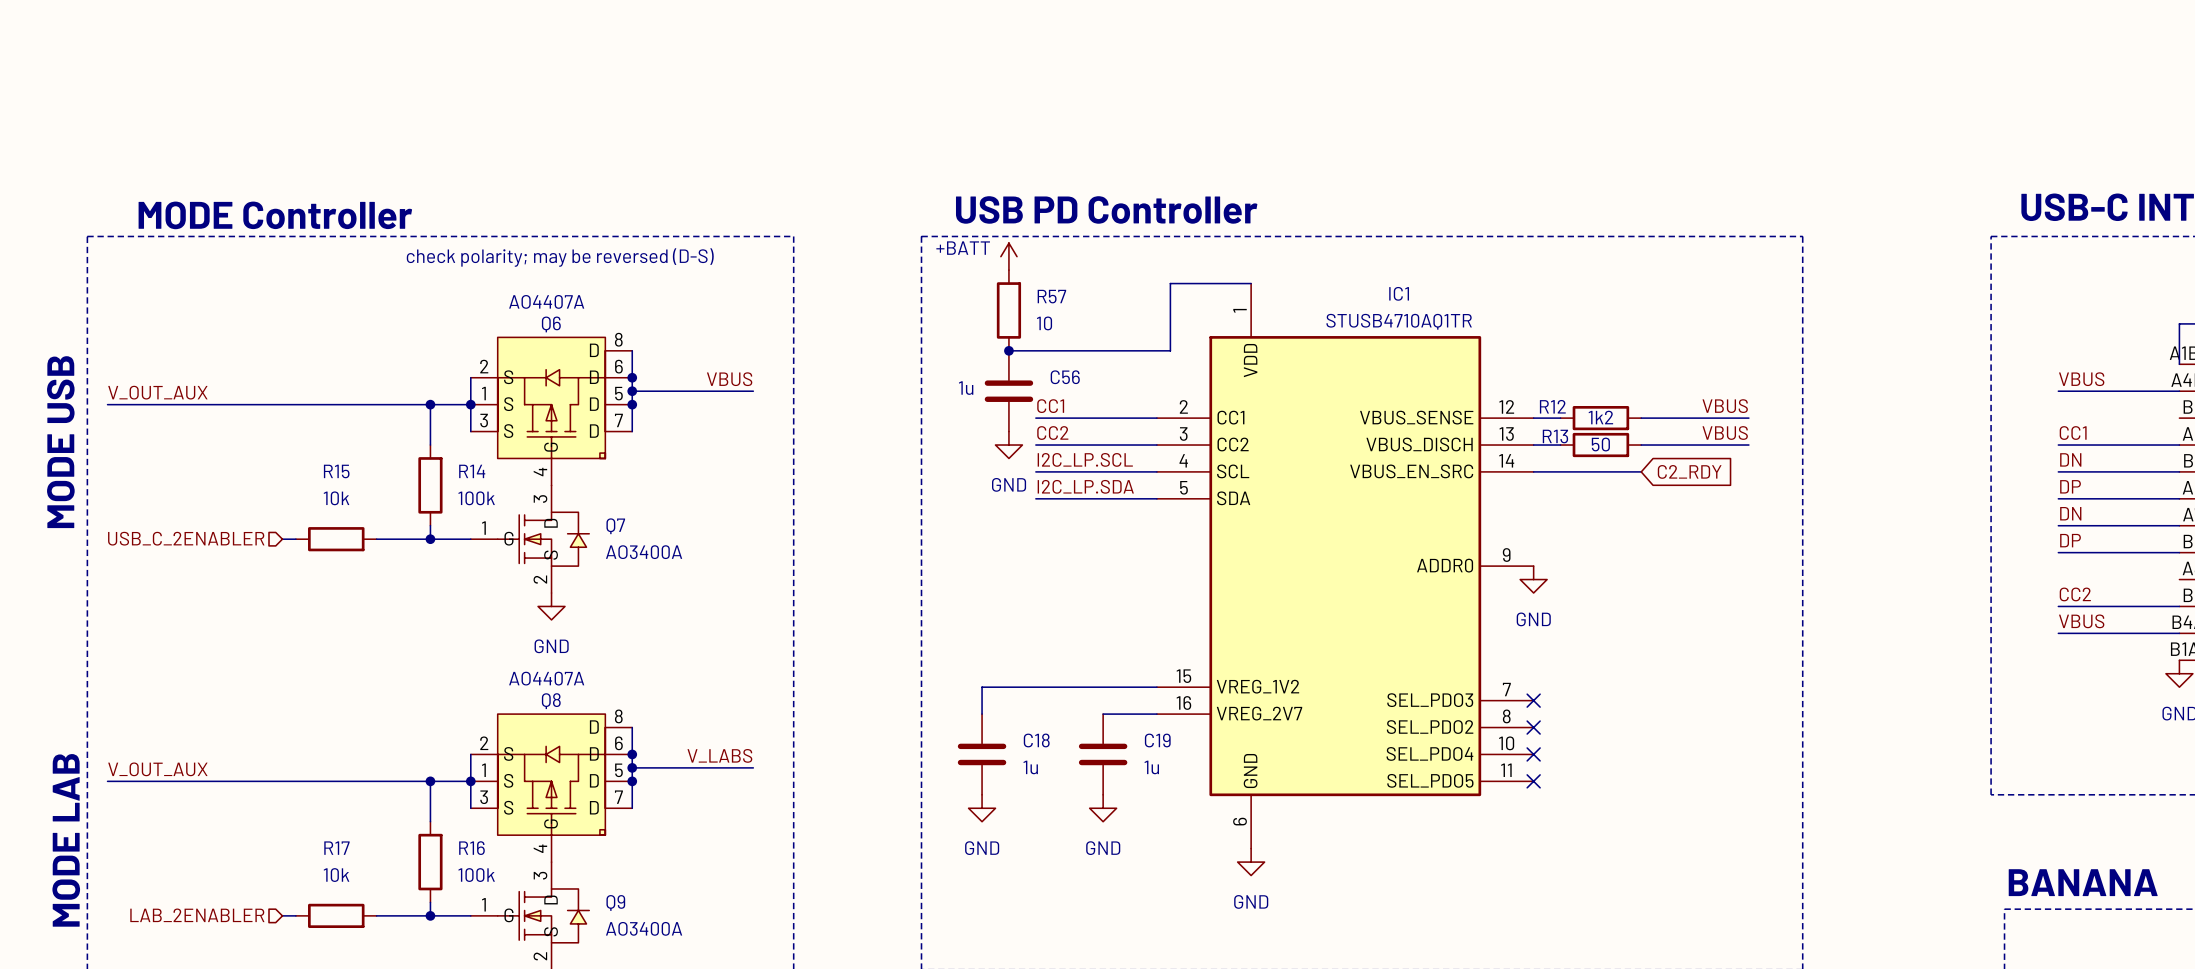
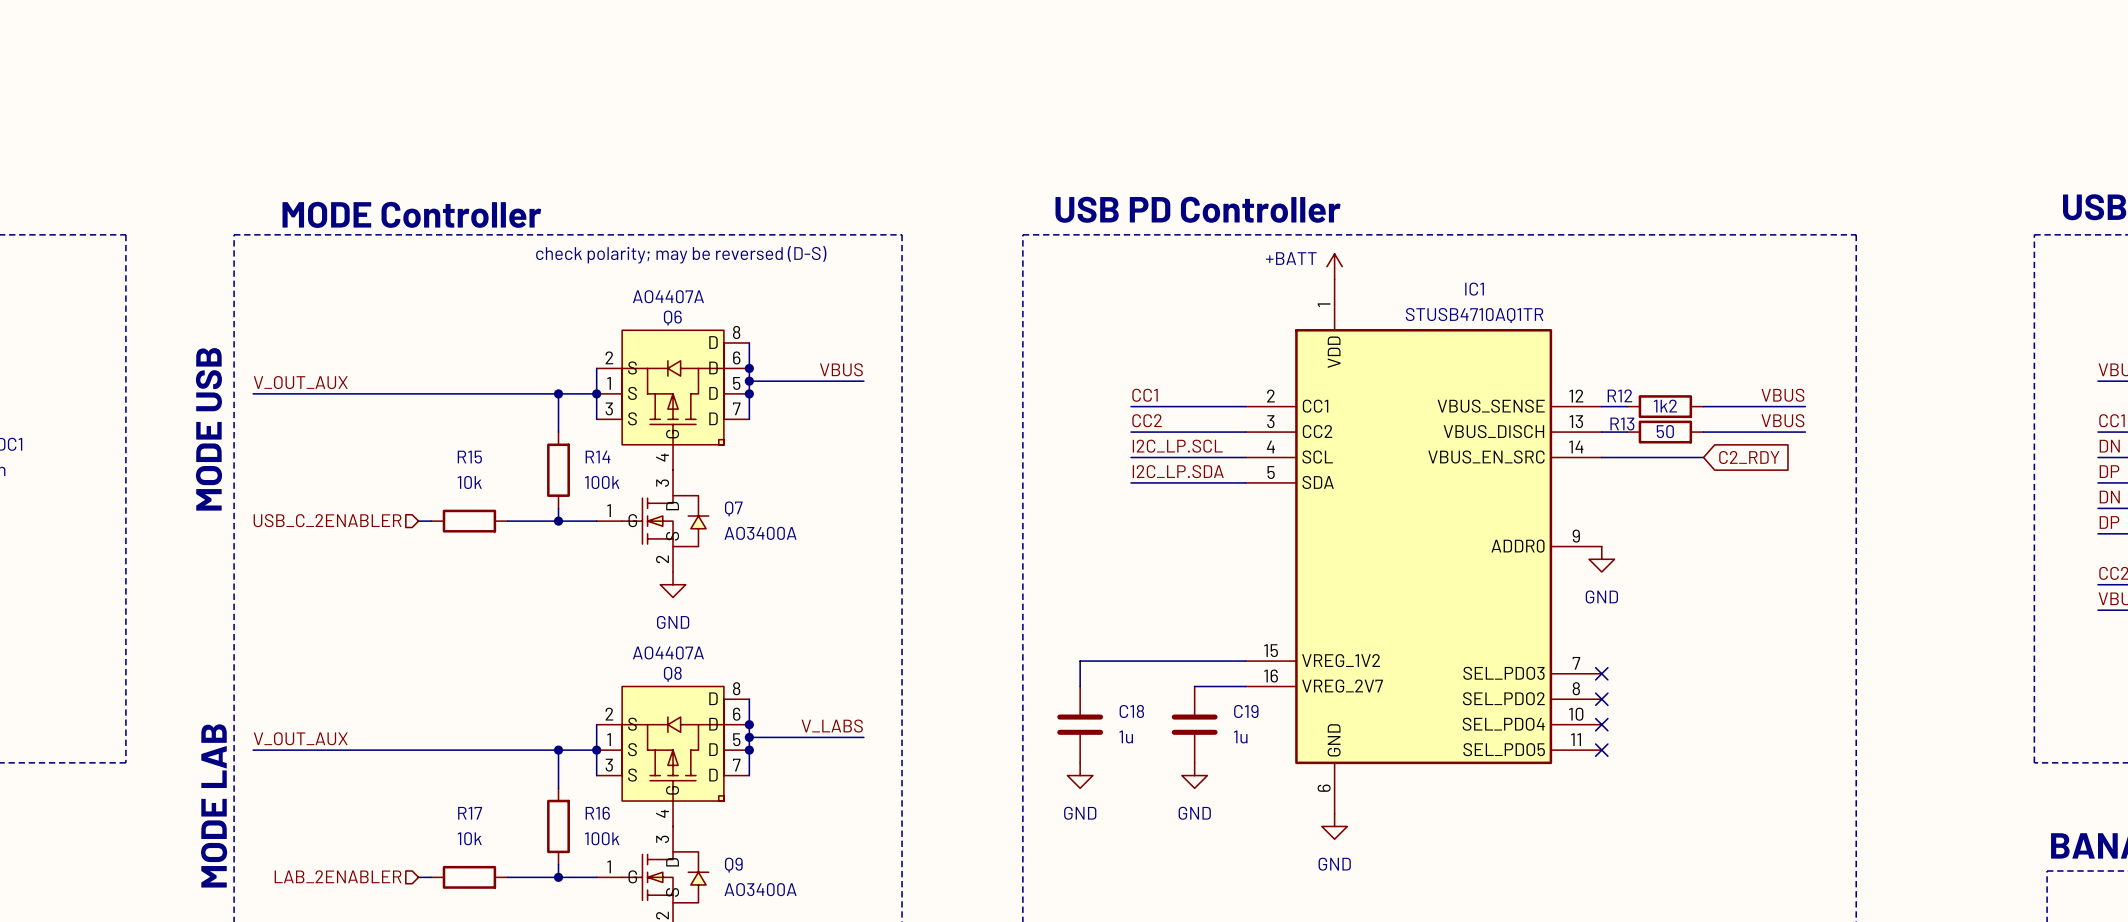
power symbol position: +BATT (1008, 256) -> +BATT (1334, 266)
wire: (1251, 283) (1170, 283) (1170, 350) (1008, 350) -> none
R57: 10 (1008, 310) -> none
junction: (1008, 350) -> none
C56: 1u (1008, 391) -> none
power symbol: GND (1008, 445) -> none

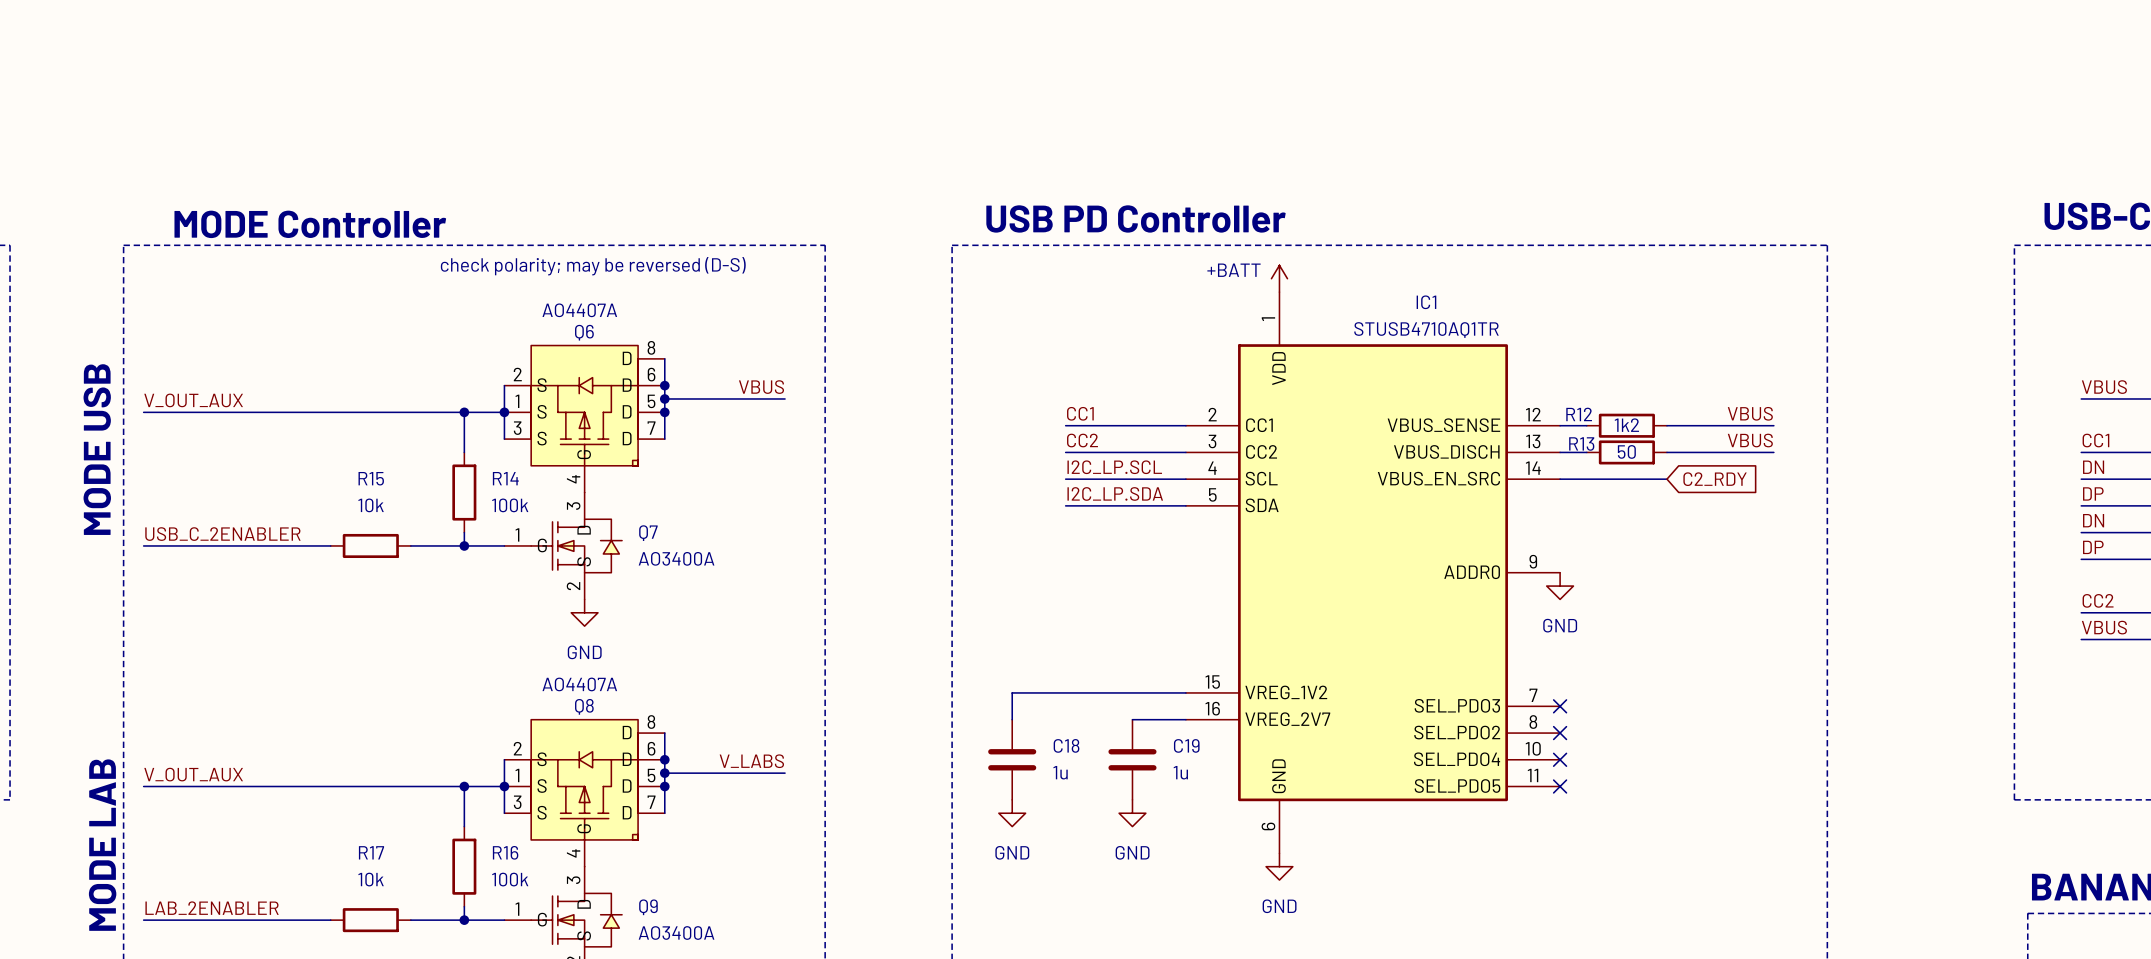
label: none -> USB_C_2ENABLER (222, 534)
hierarchical label: USB_C_2ENABLER (327, 520) -> none
wire: none -> (143, 545) (317, 545)
label: none -> LAB_2ENABLER (212, 908)
hierarchical label: LAB_2ENABLER (338, 876) -> none
wire: none -> (143, 920) (317, 920)

